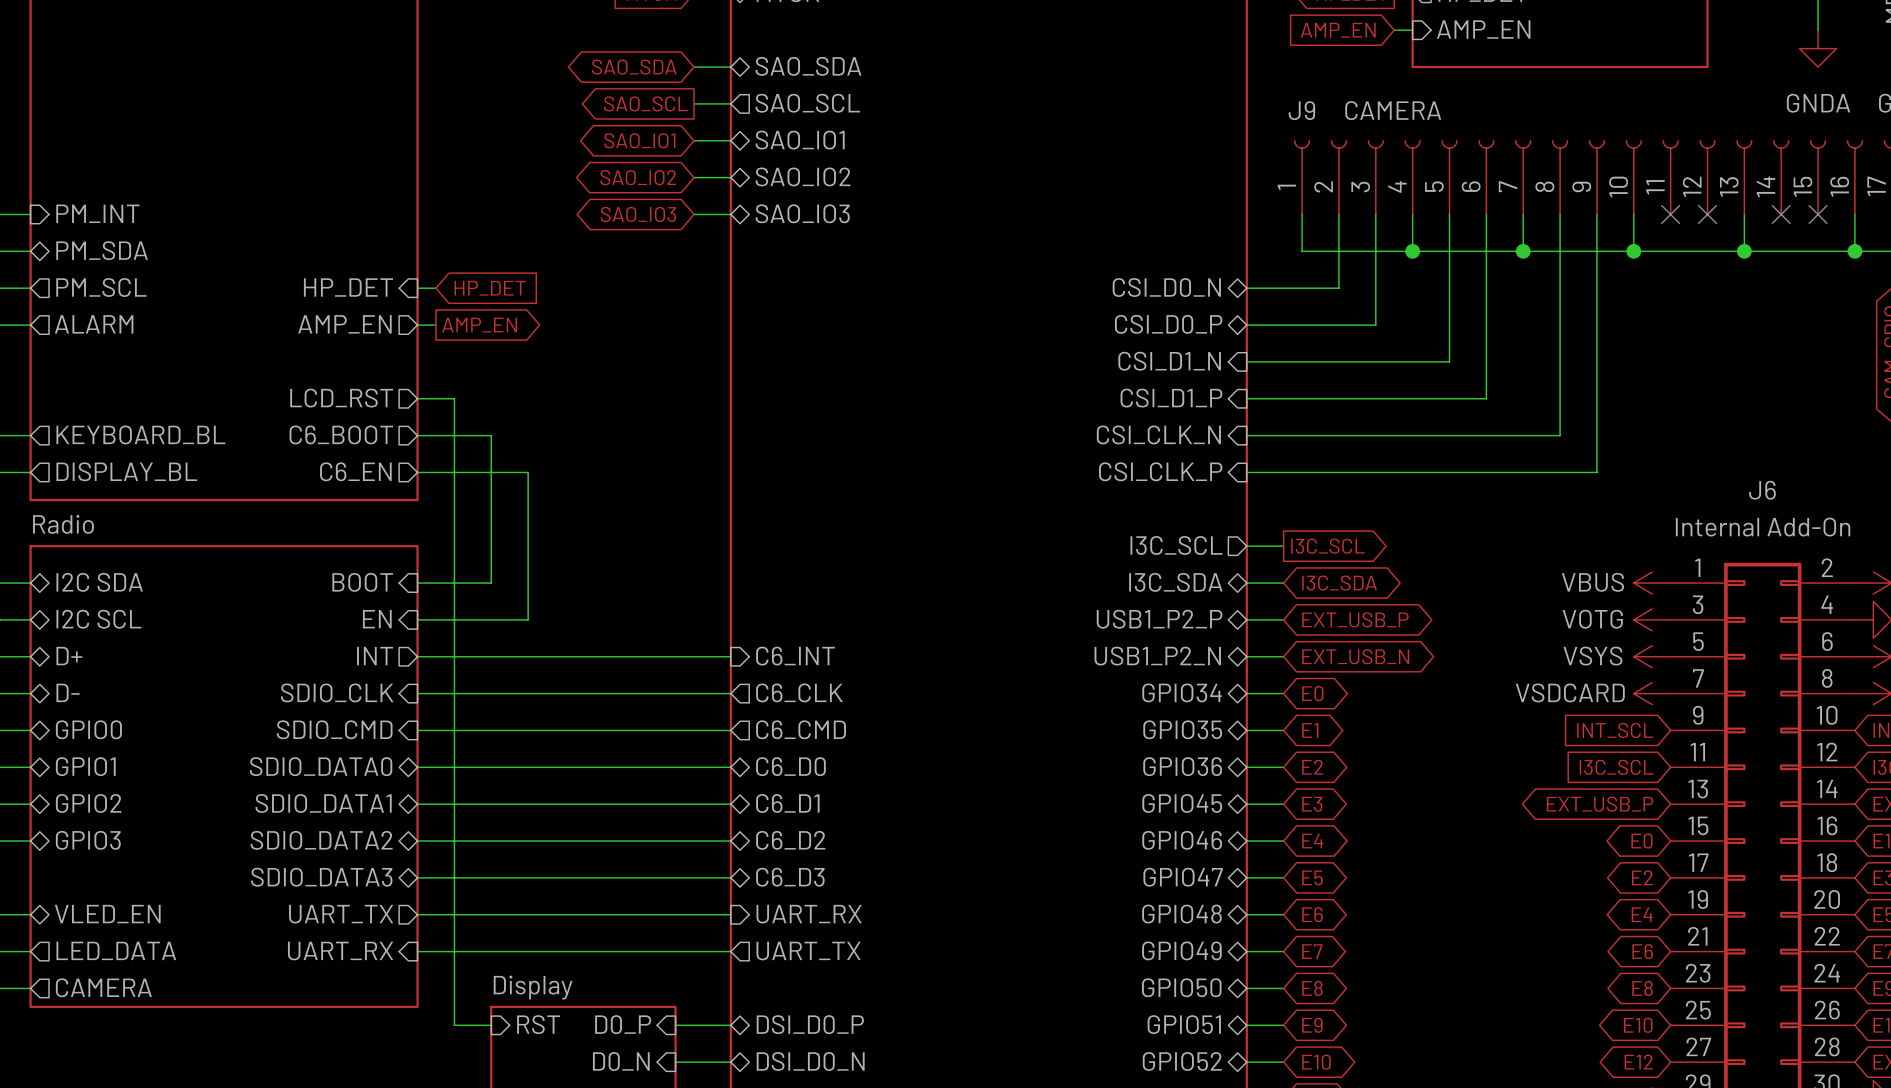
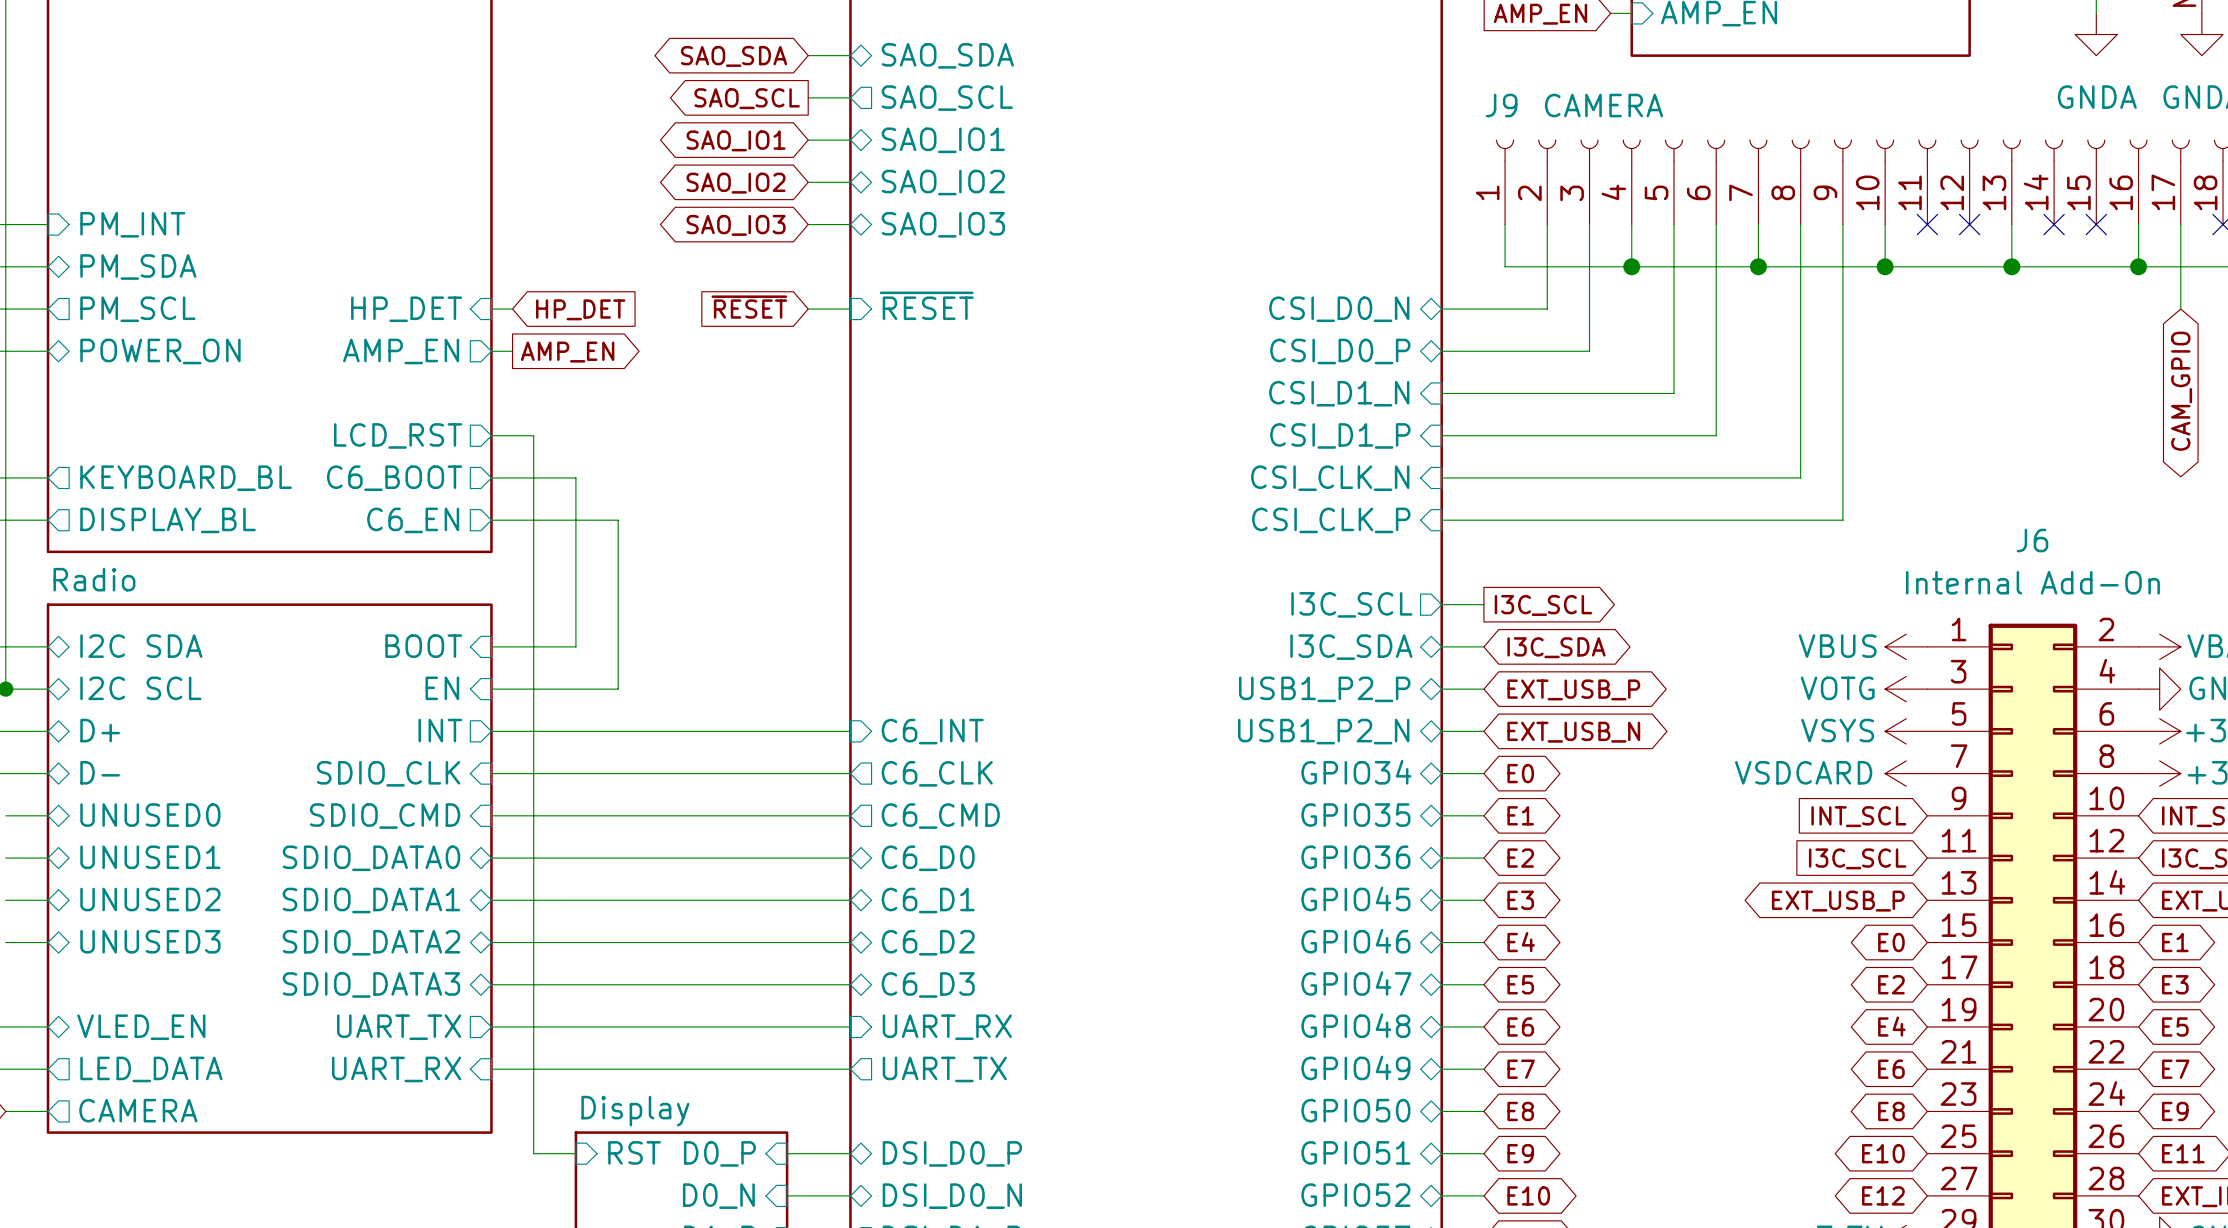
sheet pin: none -> ~{RESET} (926, 305)
global label: none -> ~{RESET} (749, 307)
wire: none -> (808, 309) (850, 309)
sheet pin shape: output (94, 324) -> bidirectional (160, 351)
sheet pin: ALARM (94, 324) -> POWER_ON (160, 351)
sheet pin: GPIO0 (88, 729) -> UNUSED0 (150, 815)
sheet pin: GPIO1 (85, 766) -> UNUSED1 (150, 857)
sheet pin: GPIO2 (88, 803) -> UNUSED2 (150, 899)
sheet pin: GPIO3 (88, 840) -> UNUSED3 (150, 941)

